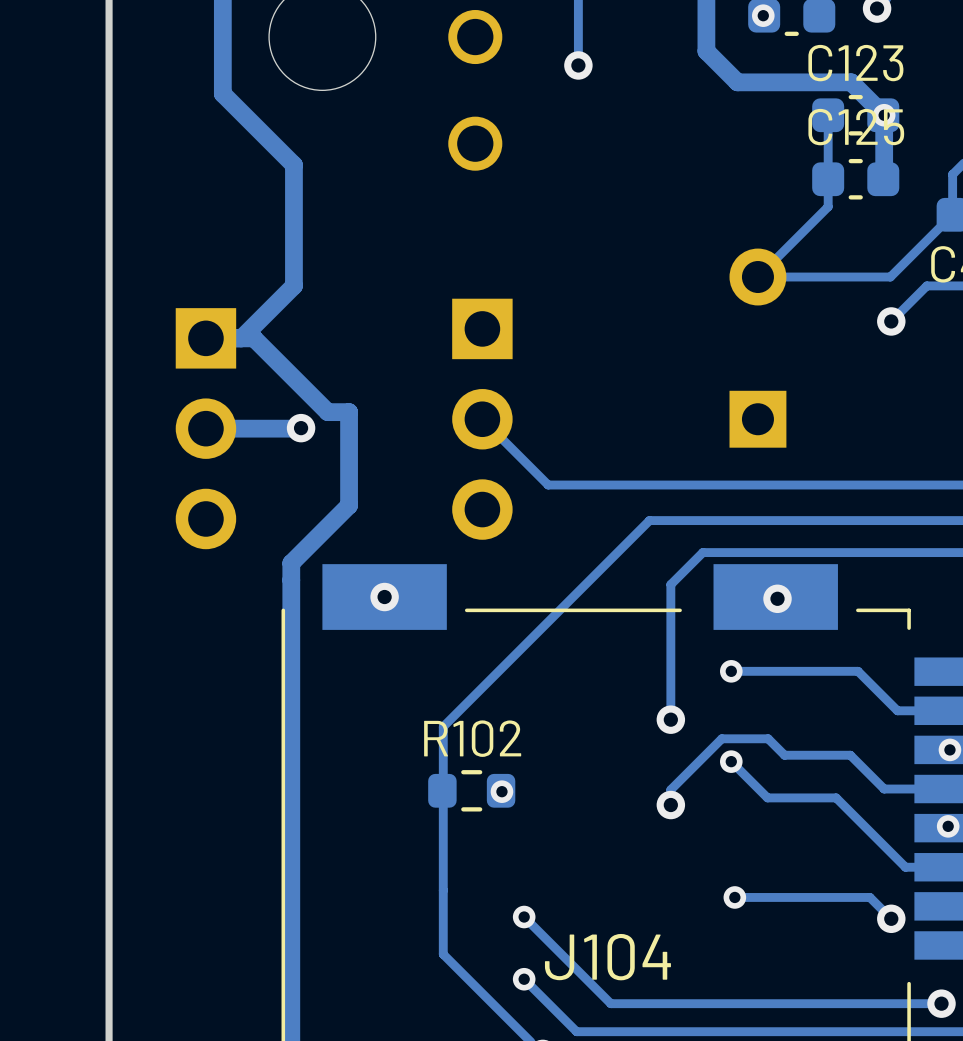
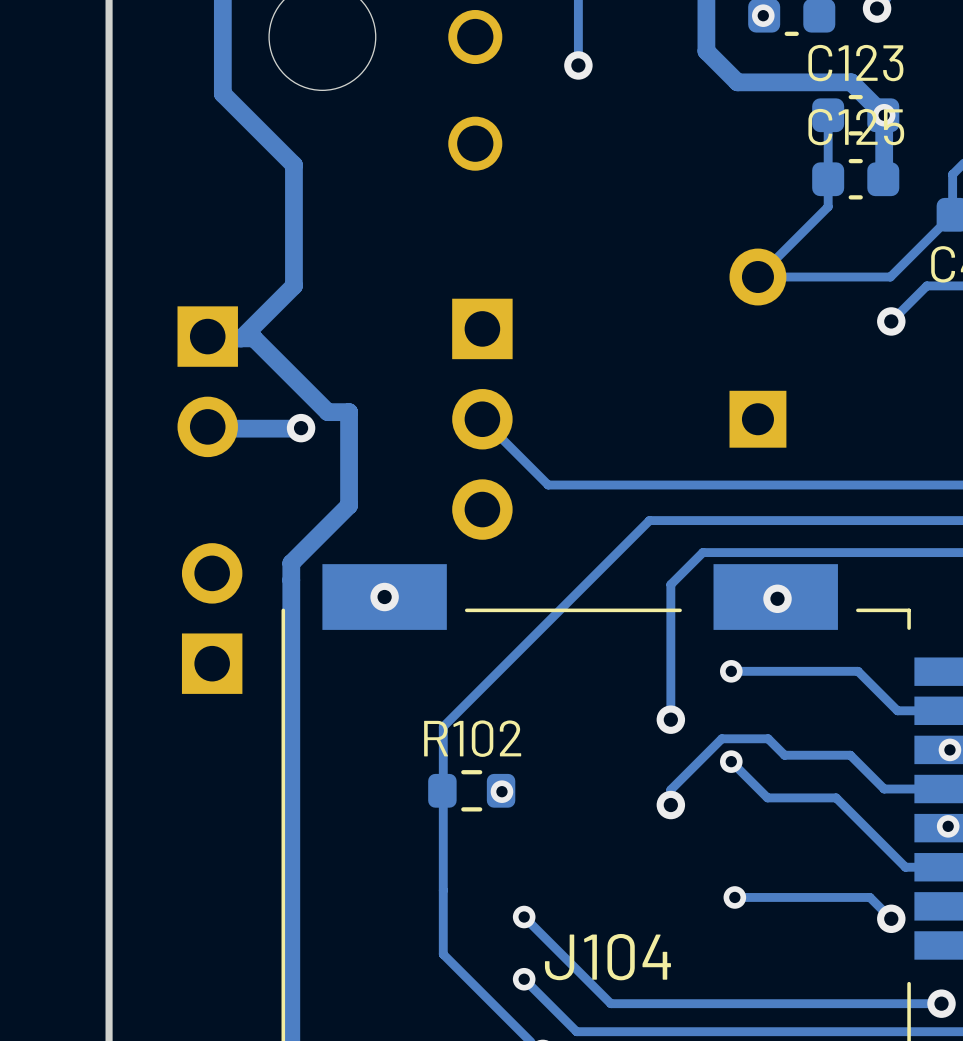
part: none -> (207, 381)
part: (205, 428) -> none
part: none -> (212, 618)

